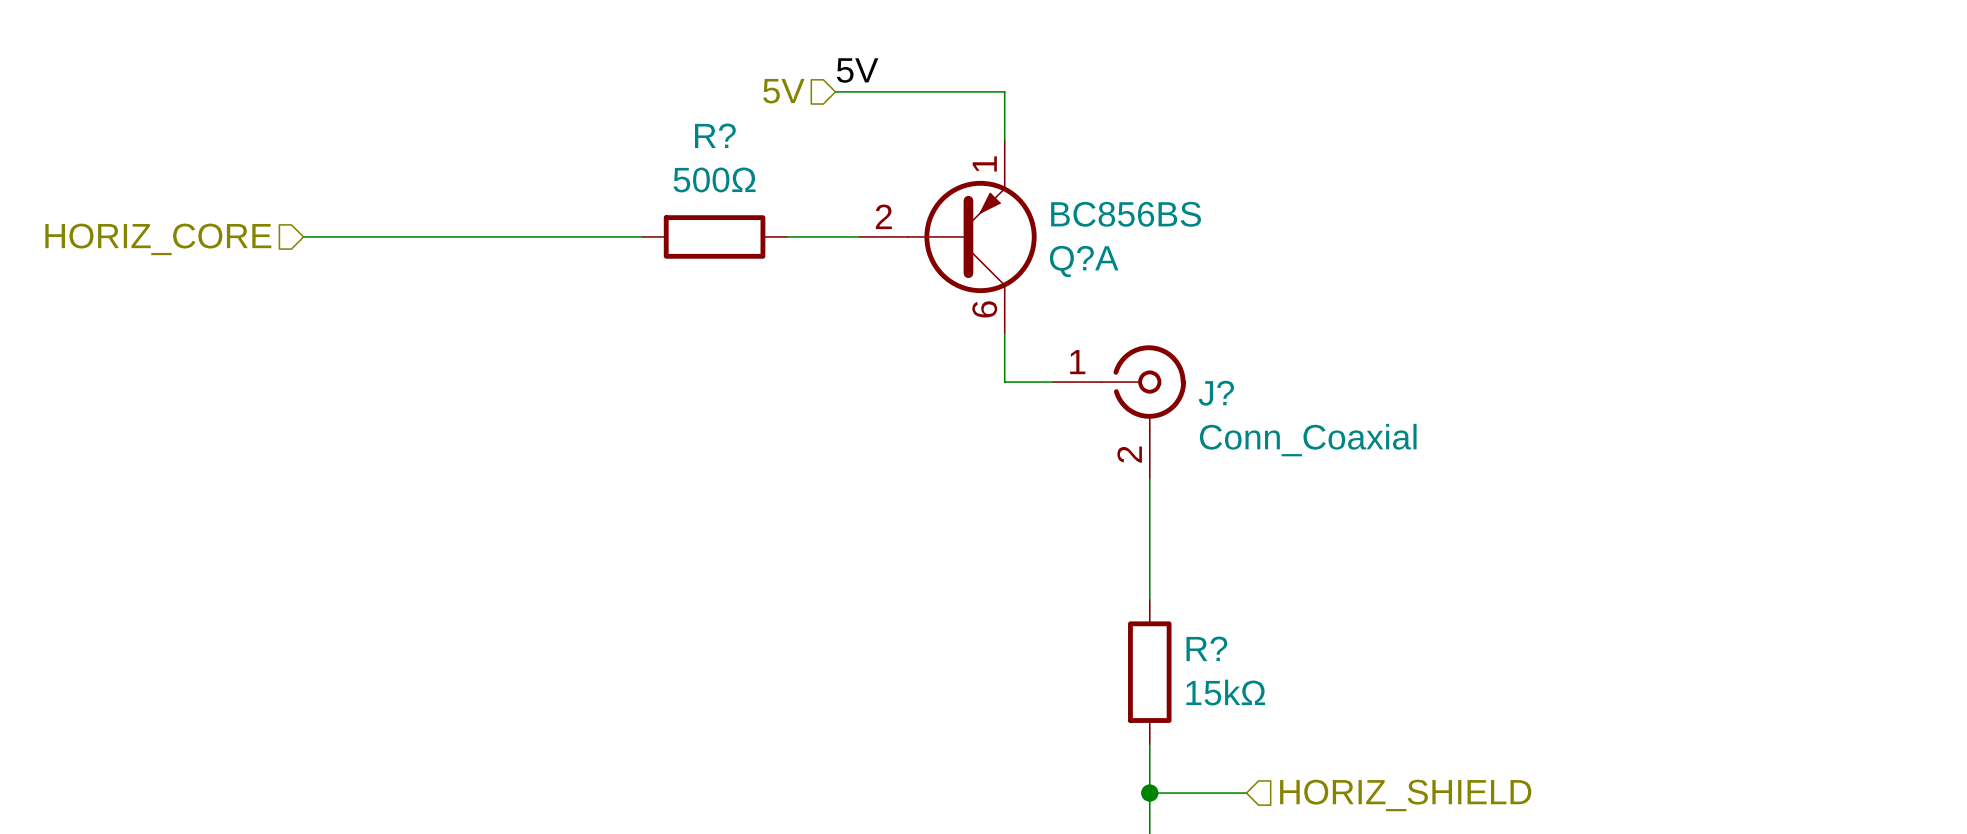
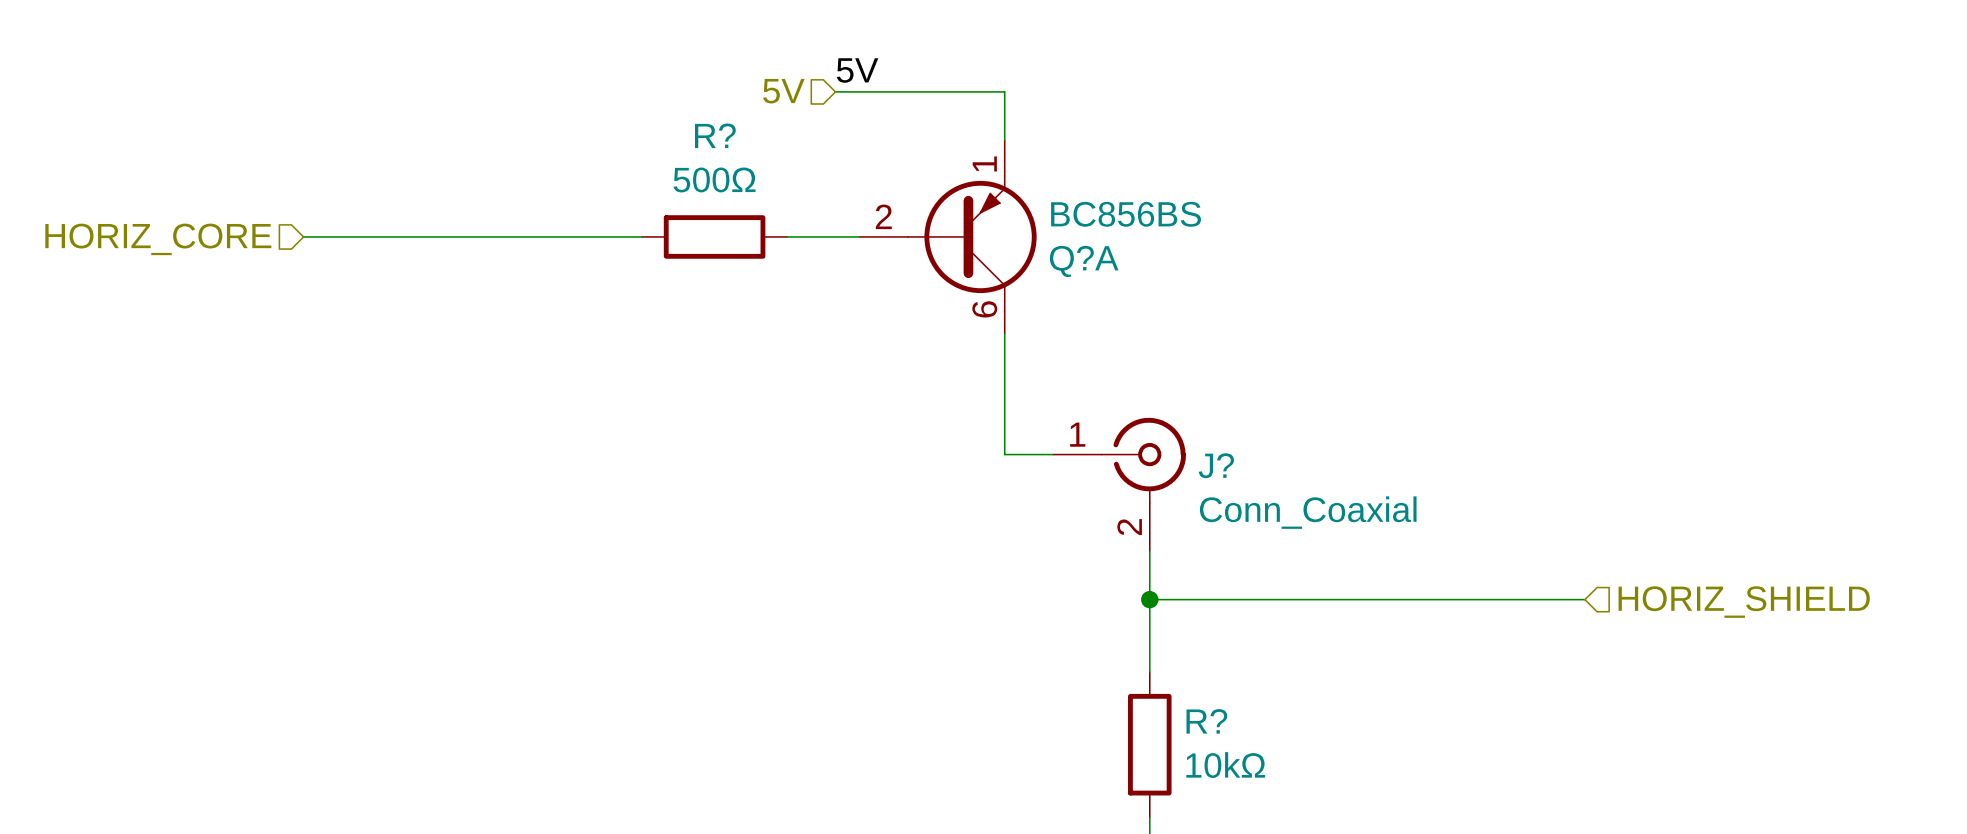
wire: (1004, 382) (1053, 382) -> (1004, 382) (1004, 454) (1053, 454)
J? position: (1119, 412) -> (1119, 484)
junction: none -> (1149, 599)
wire: none -> (1584, 599) (1149, 599) (1149, 672)
R?: 15kΩ (1149, 672) -> none
wire: (1149, 744) (1149, 817) -> none
R?: none -> 10kΩ (1149, 744)
wire: (1149, 793) (1246, 793) -> none
junction: (1149, 793) -> none
hierarchical label position: HORIZ_SHIELD (1405, 795) -> HORIZ_SHIELD (1744, 602)

